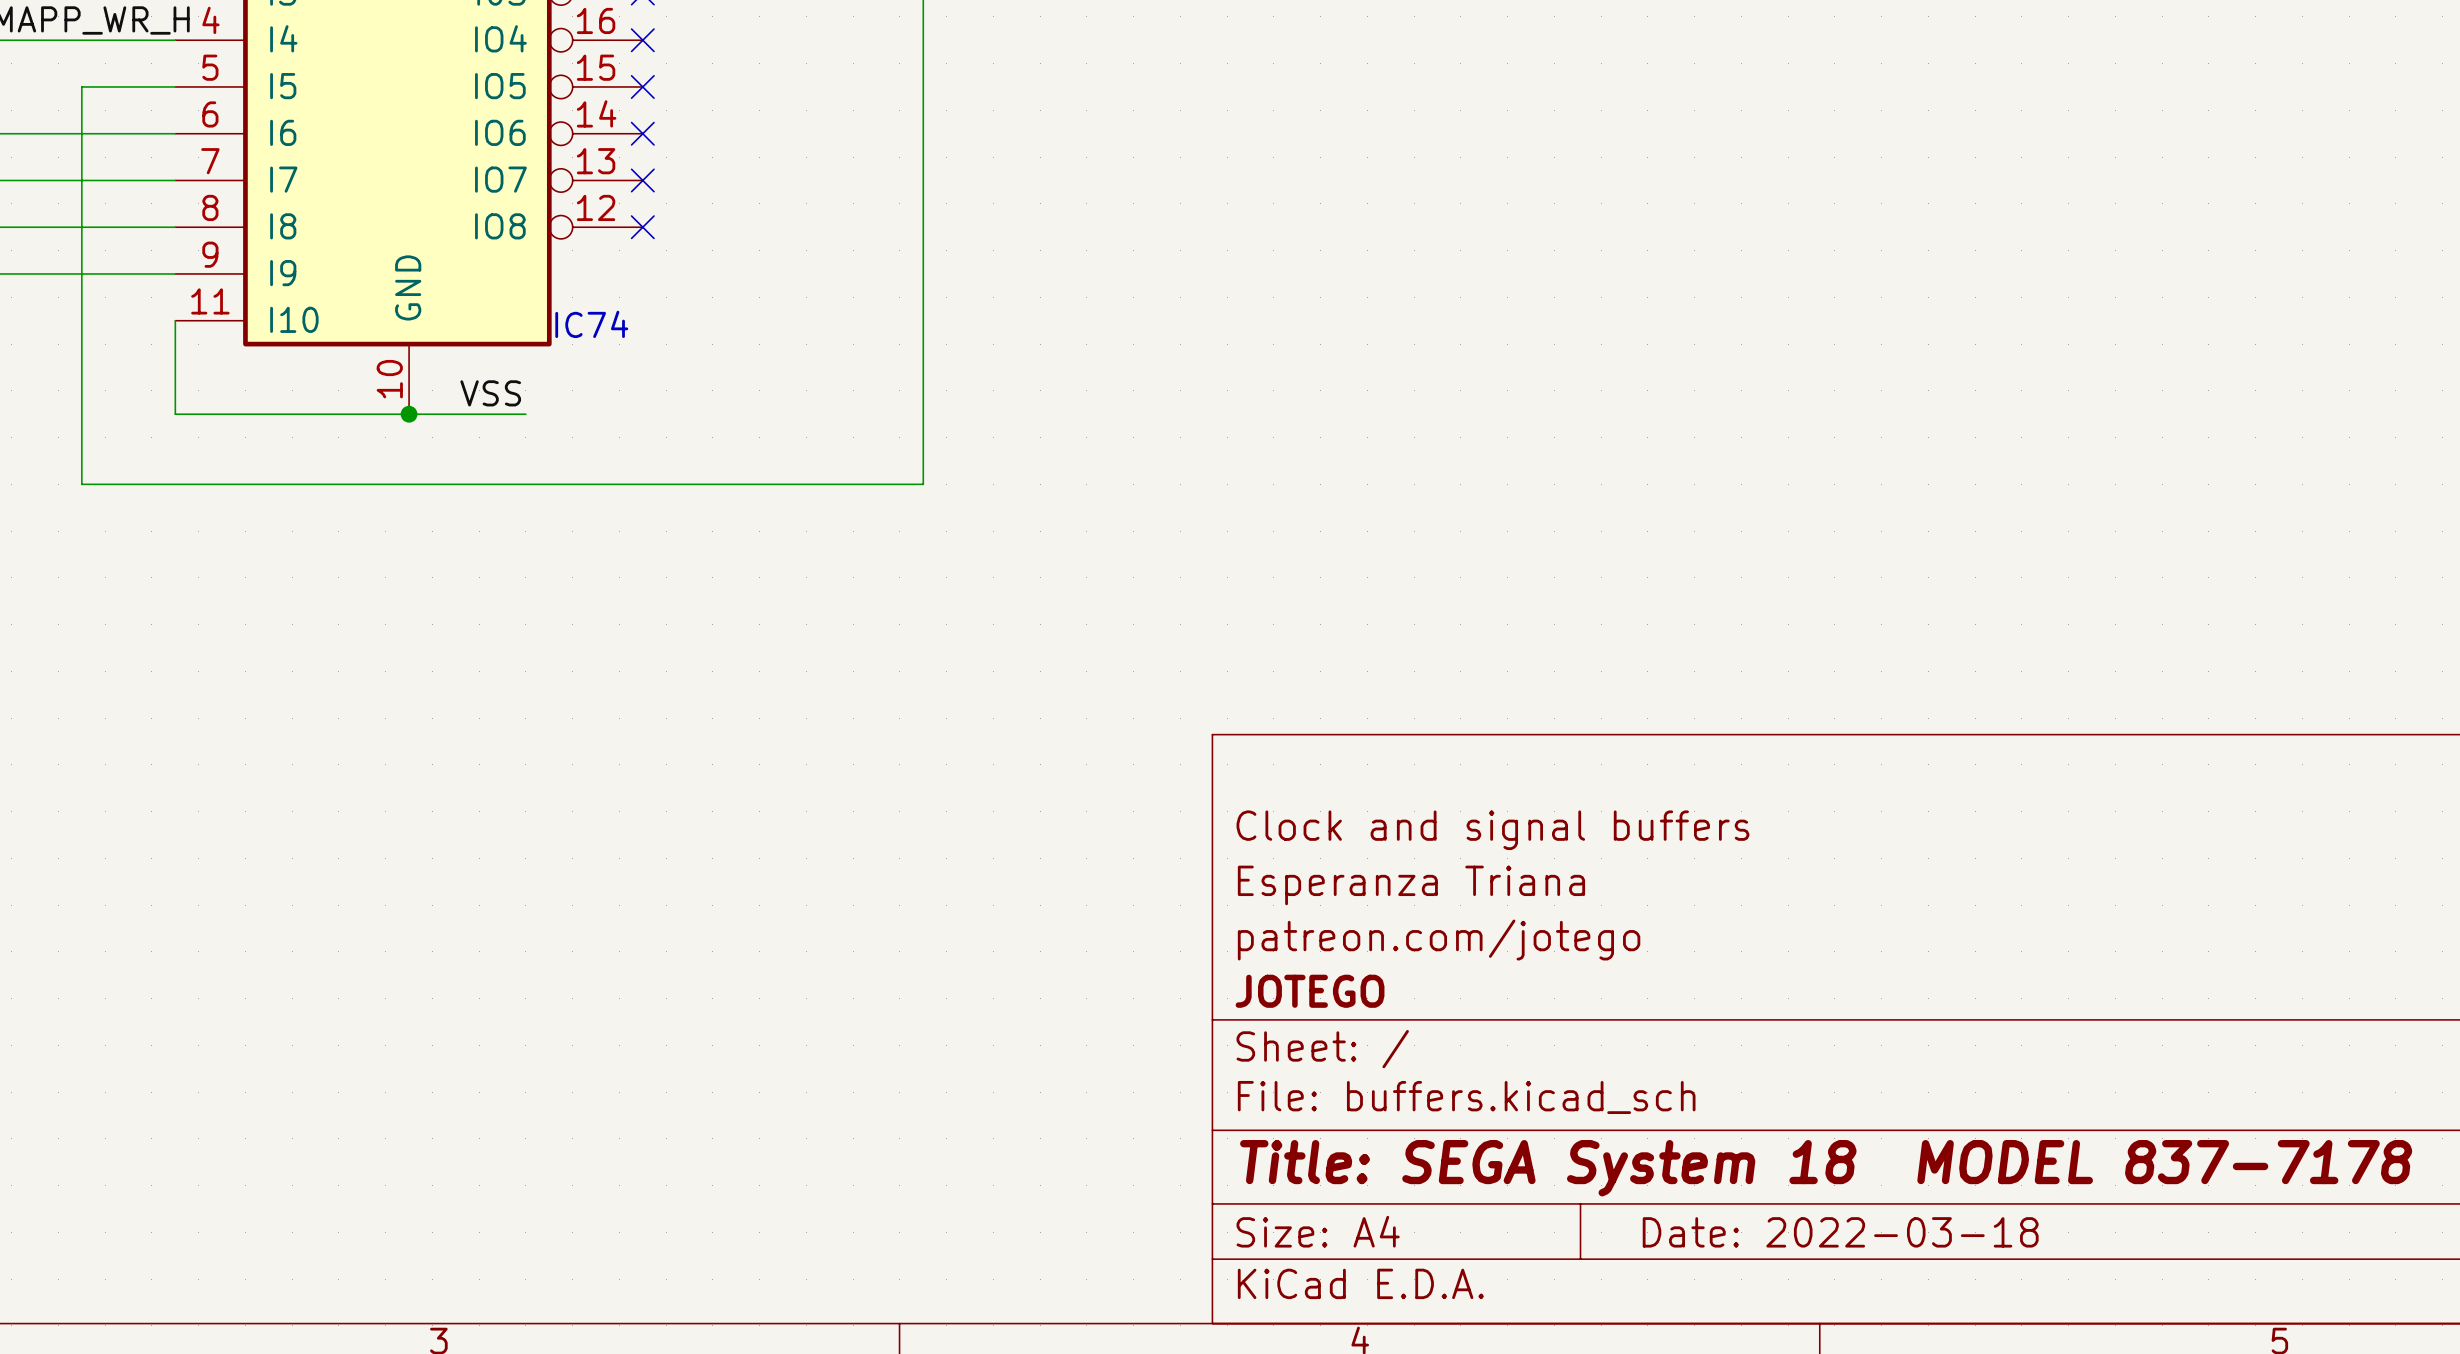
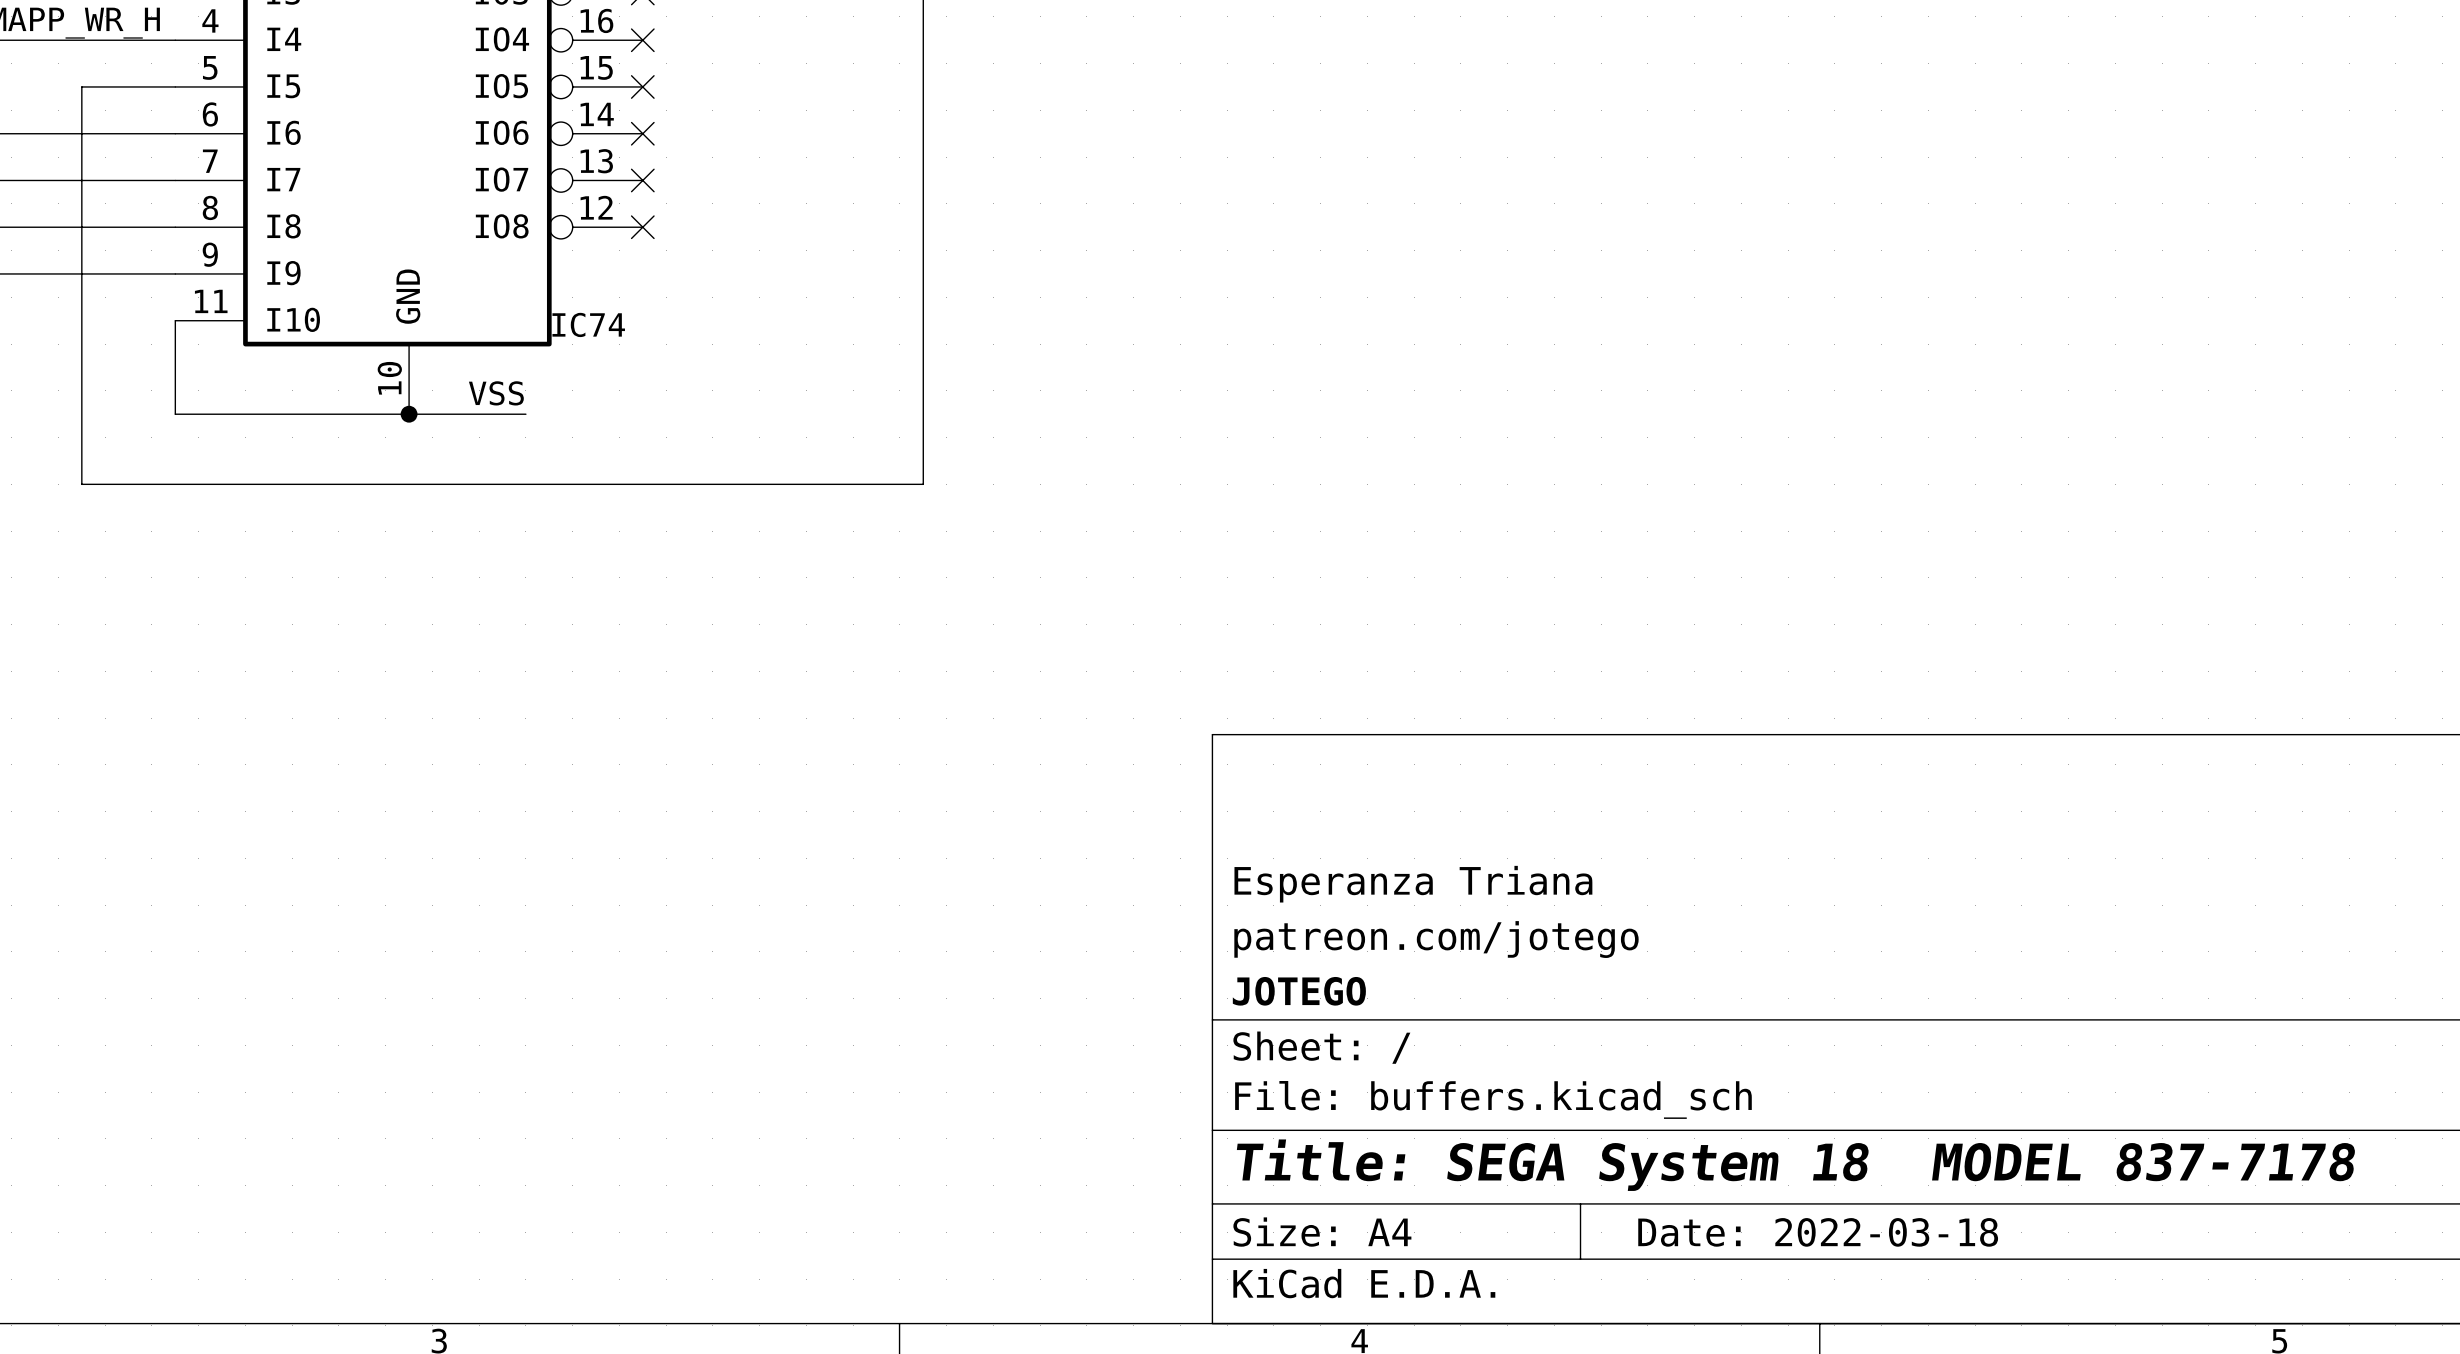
title block: Clock and signal buffers (1492, 830) -> none

